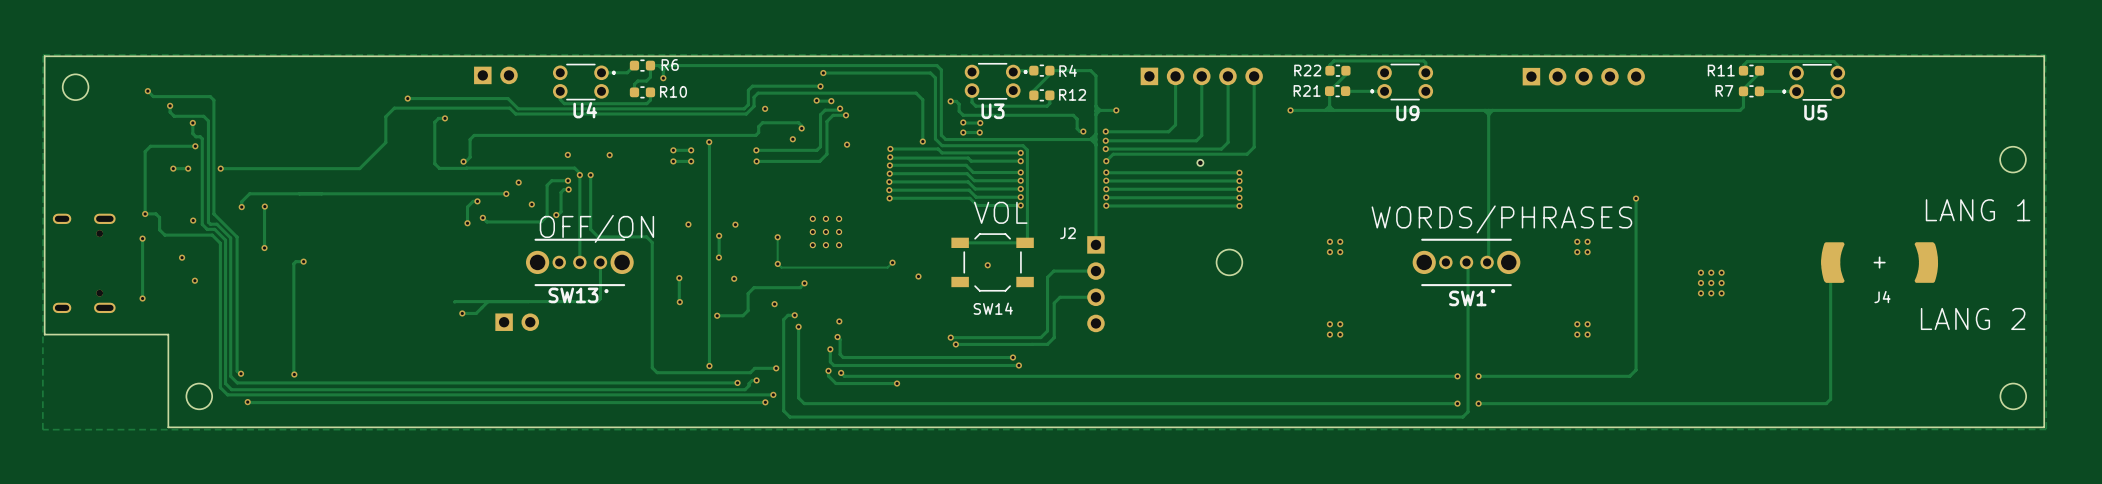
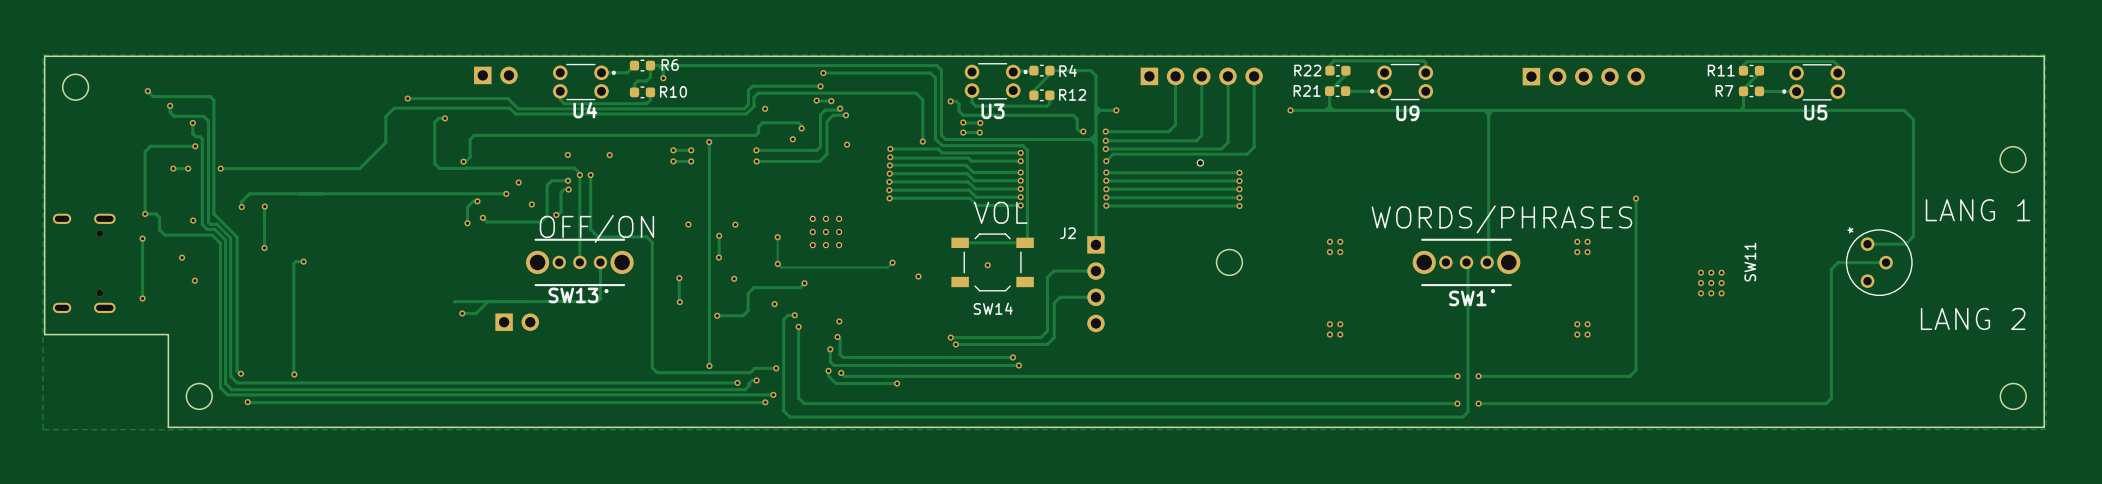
track: none -> (1740, 110) (1904, 110) (1913, 119) (1913, 236) (1905, 244) (1867, 244)
track: (1831, 261) (1830, 399) -> (1886, 262) (1838, 262) (1831, 269) (1830, 399)
J4: (1879, 262) -> none
SW11: none -> (1879, 262)

